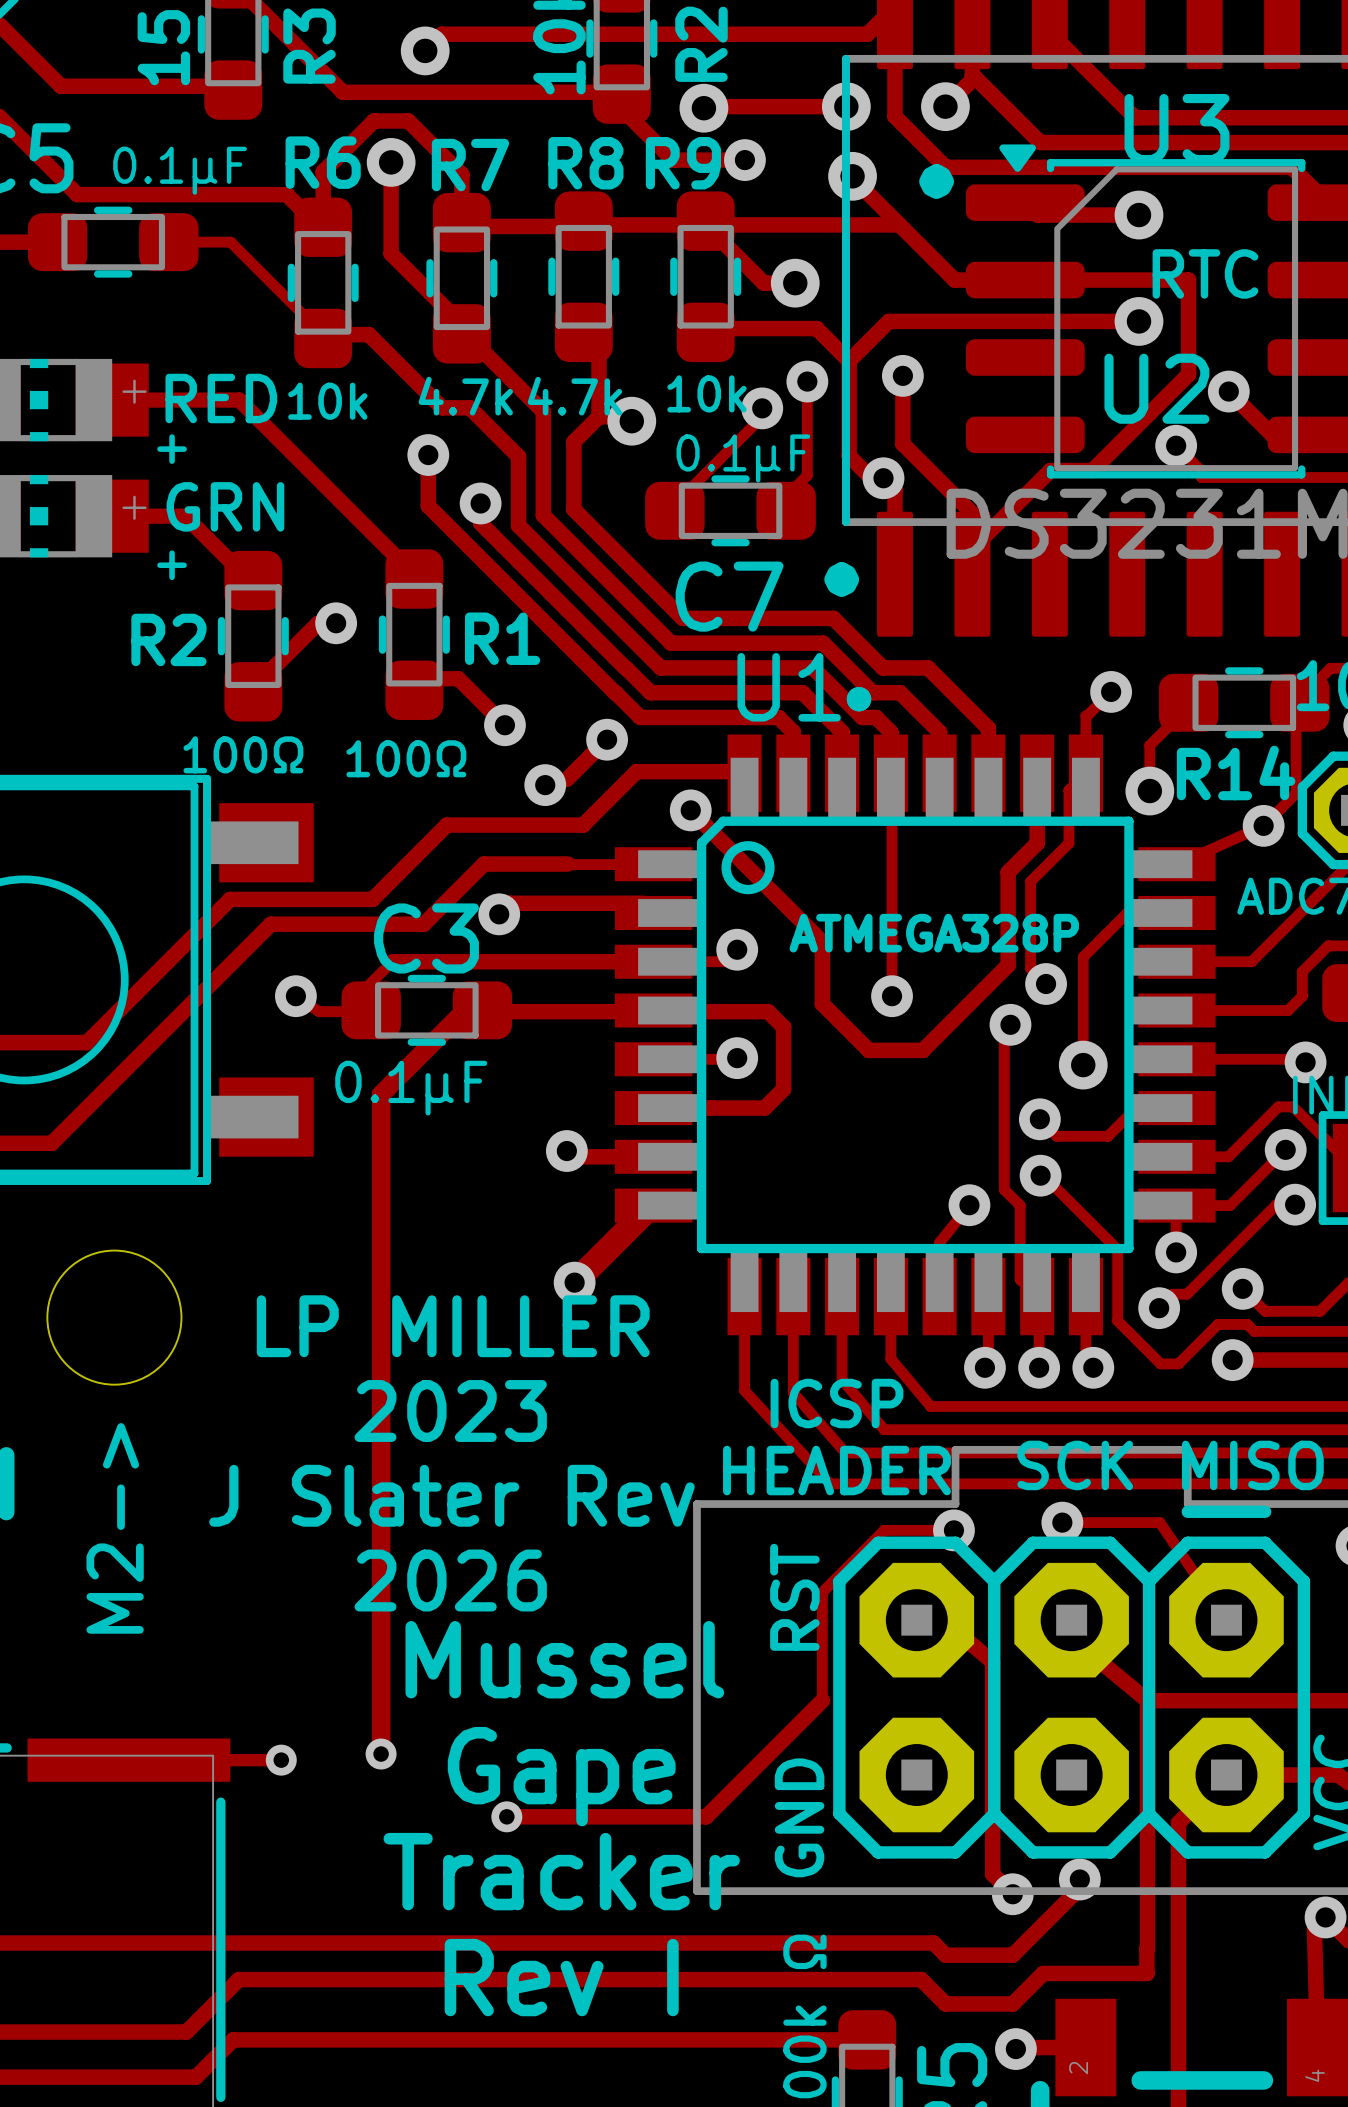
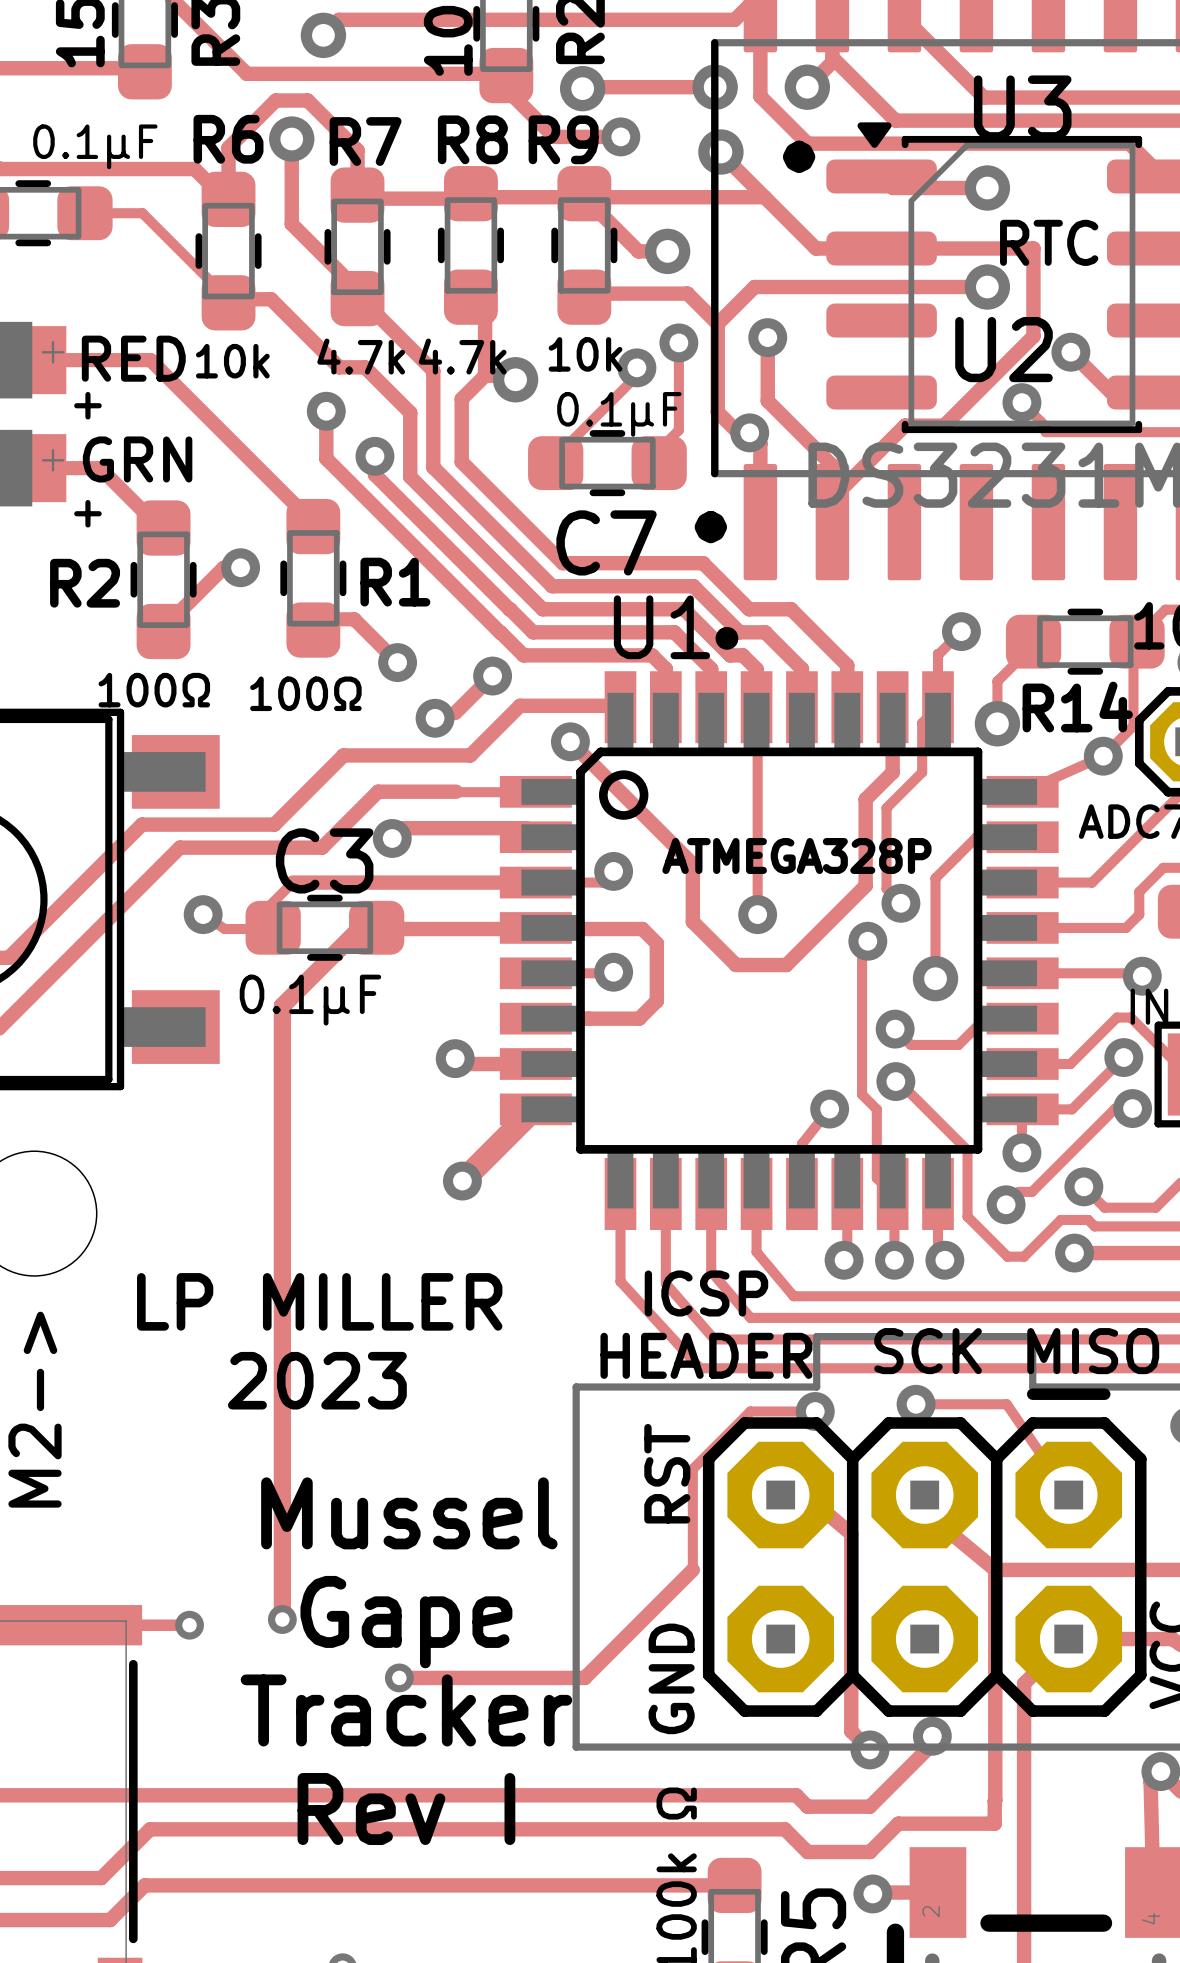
text: LP MILLER (453, 1326) -> none
text: 2023 (450, 1411) -> LP MILLER (319, 1301)
text: J Slater Rev (451, 1495) -> 2023 (317, 1380)
text: 2026 (450, 1580) -> none
text position: Mussel (564, 1659) -> Mussel (409, 1513)
text position: Gape (561, 1776) -> Gape (406, 1622)
text position: Tracker (561, 1871) -> Tracker (406, 1710)
text position: Rev I (561, 1977) -> Rev I (406, 1809)

